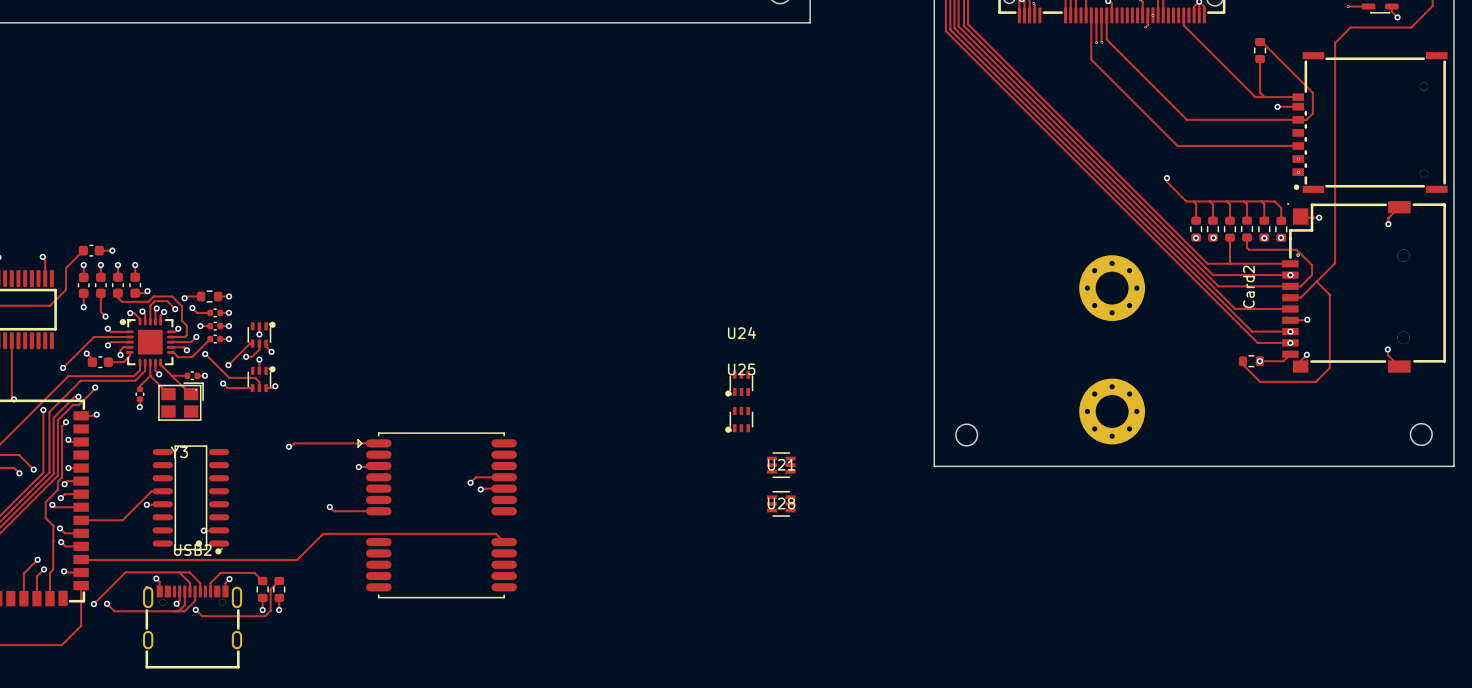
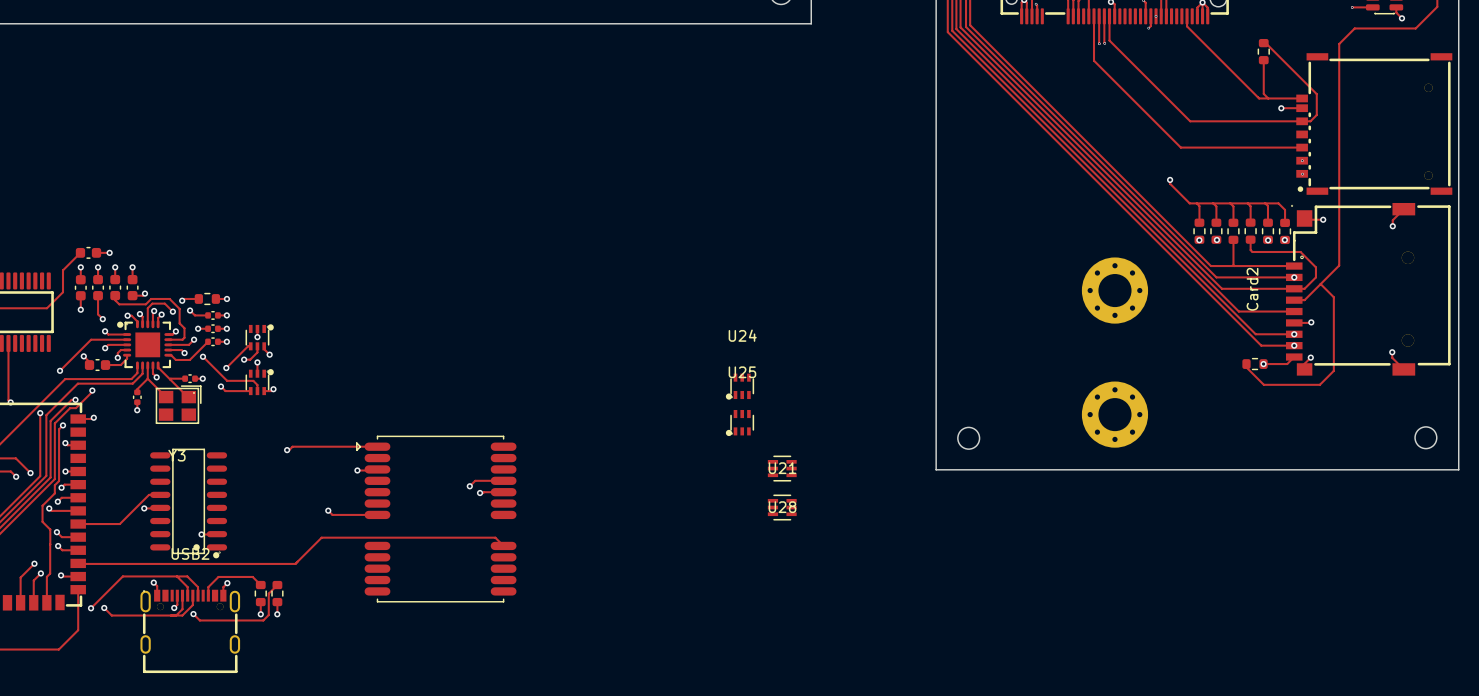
track: (42, 256) (45, 259) (45, 278) -> none
via: (42, 256) -> none

